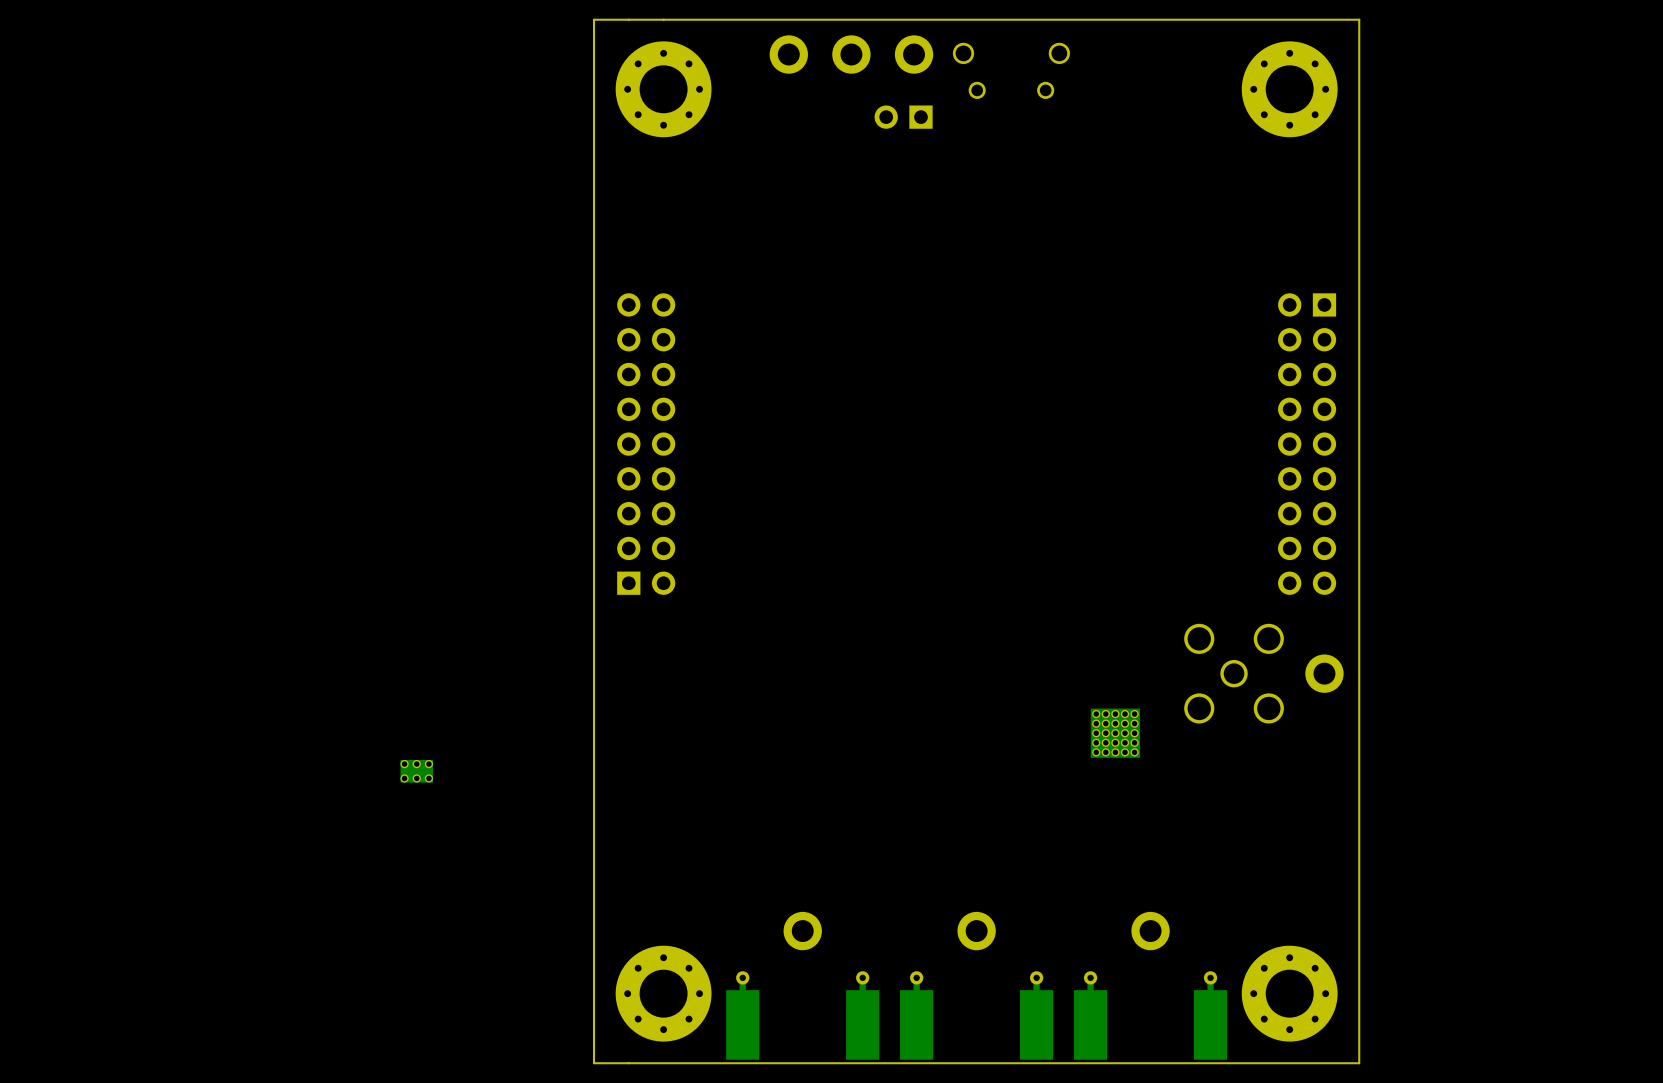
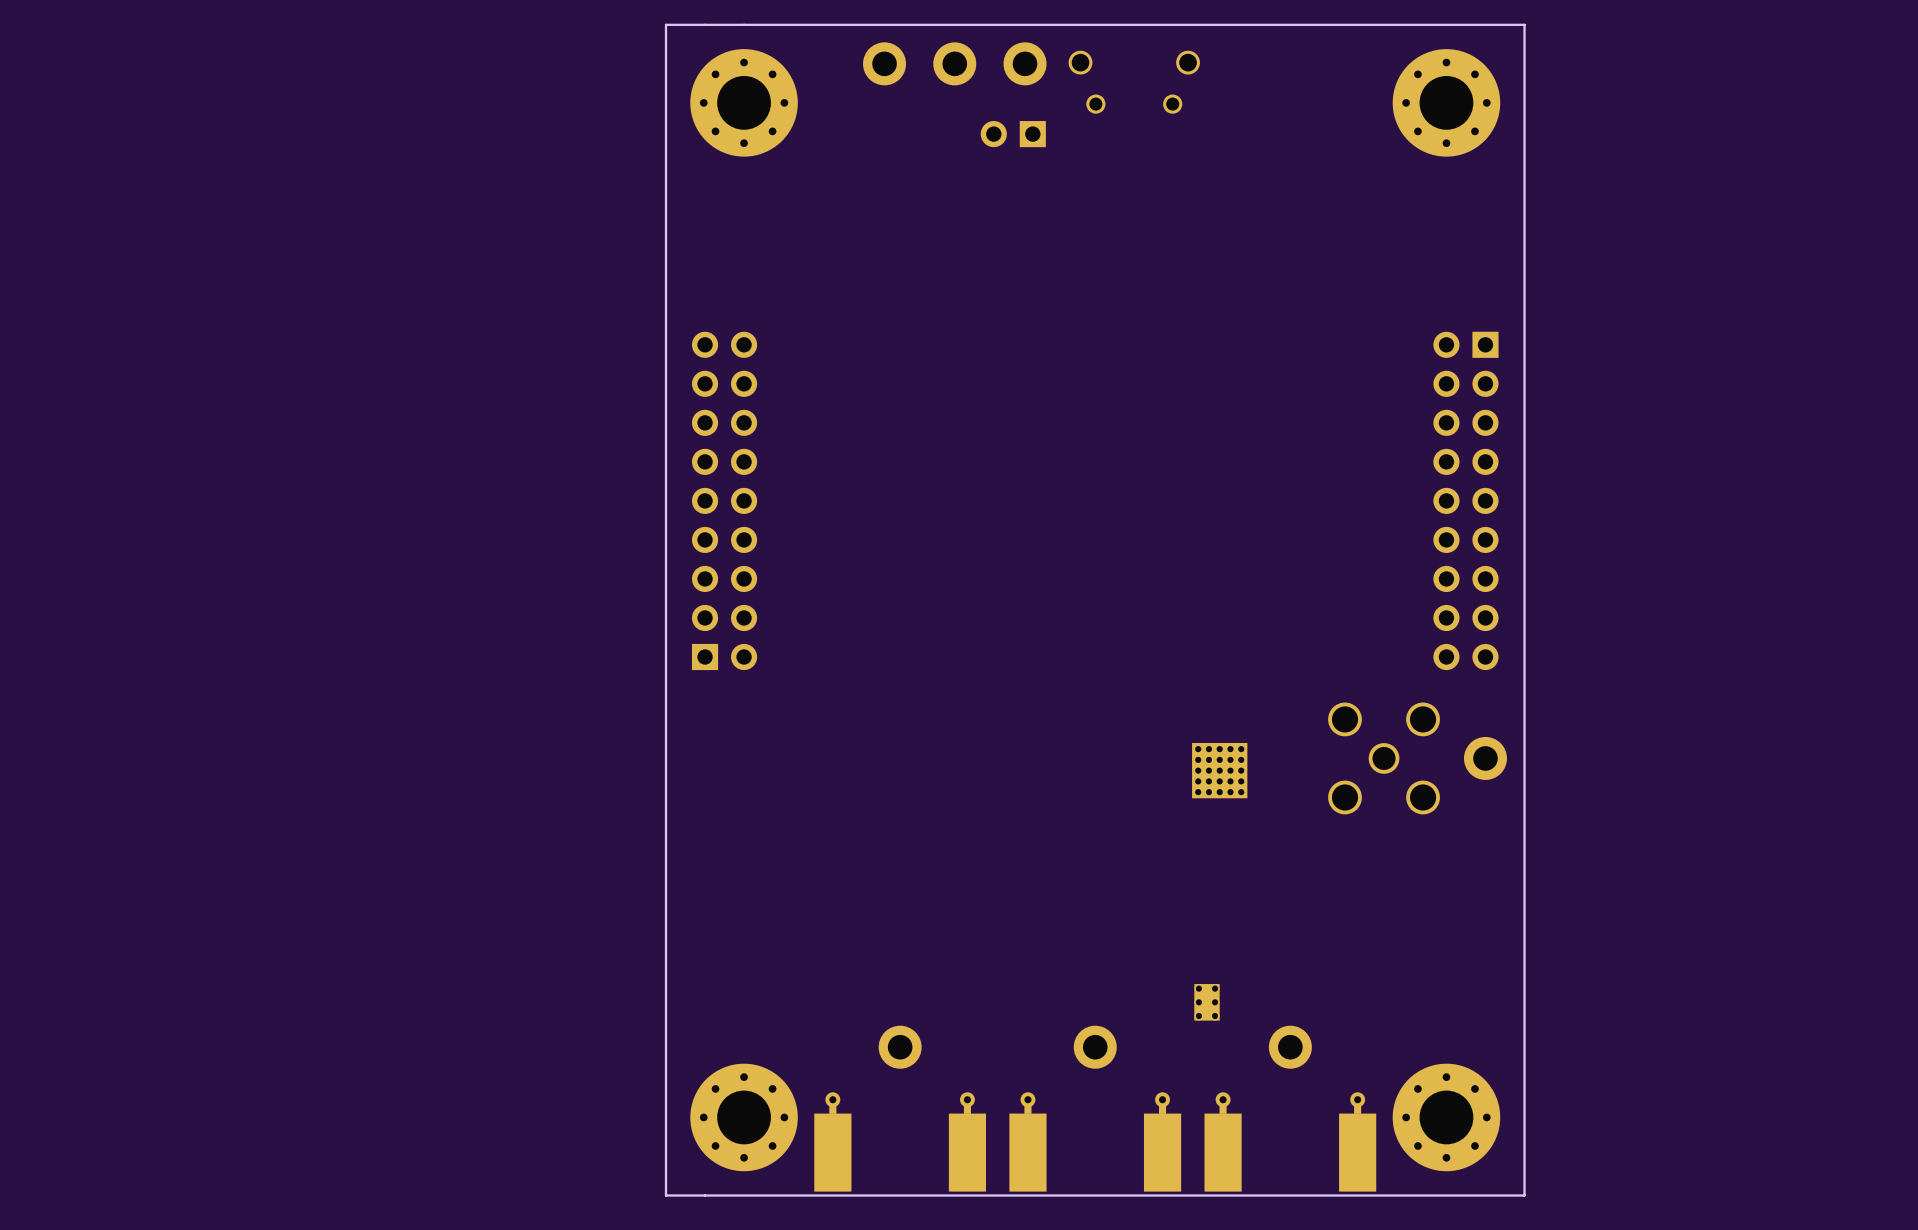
part position: (1115, 733) -> (1219, 770)
part: (416, 771) -> none
part: none -> (1206, 1002)

